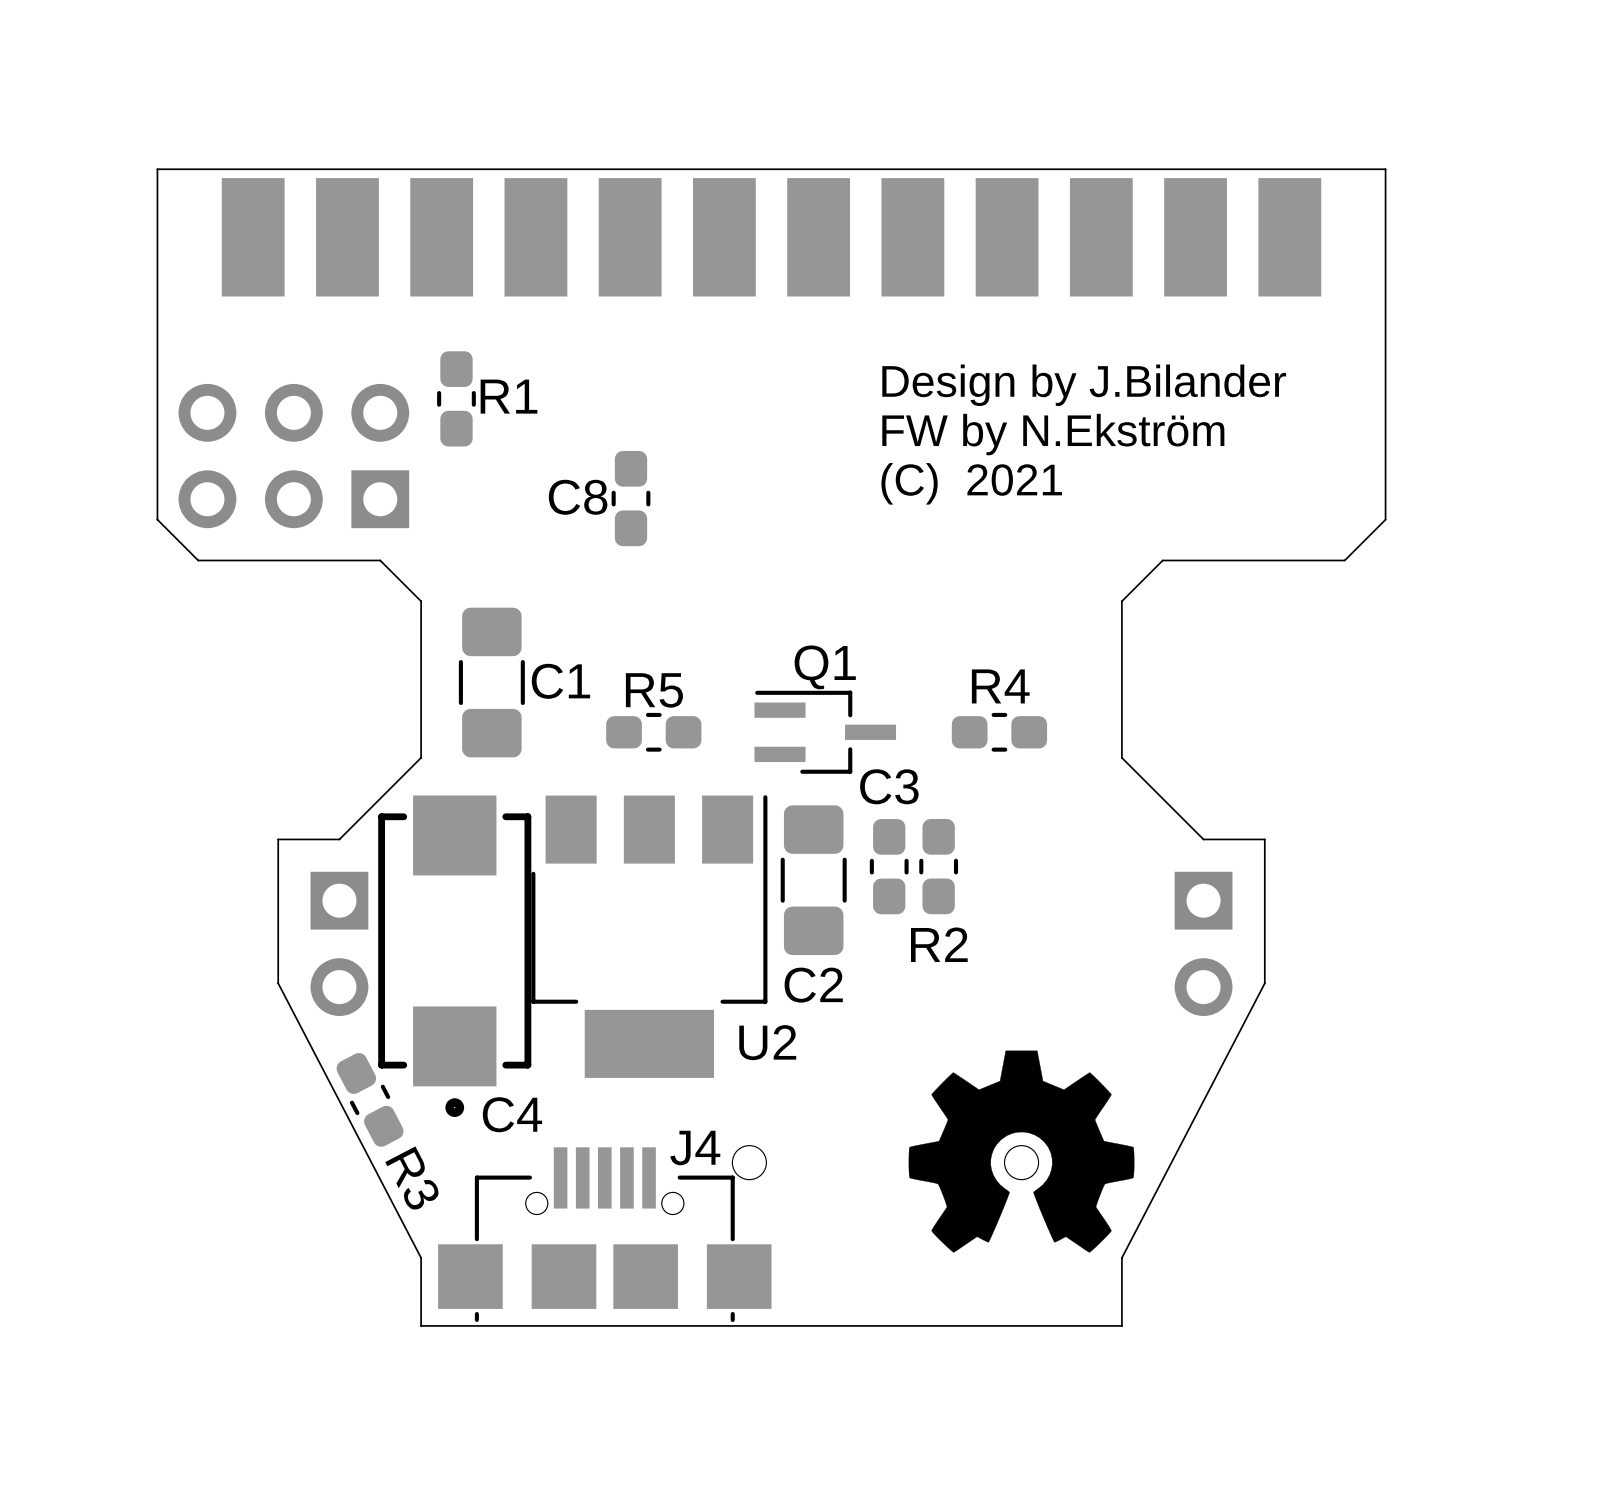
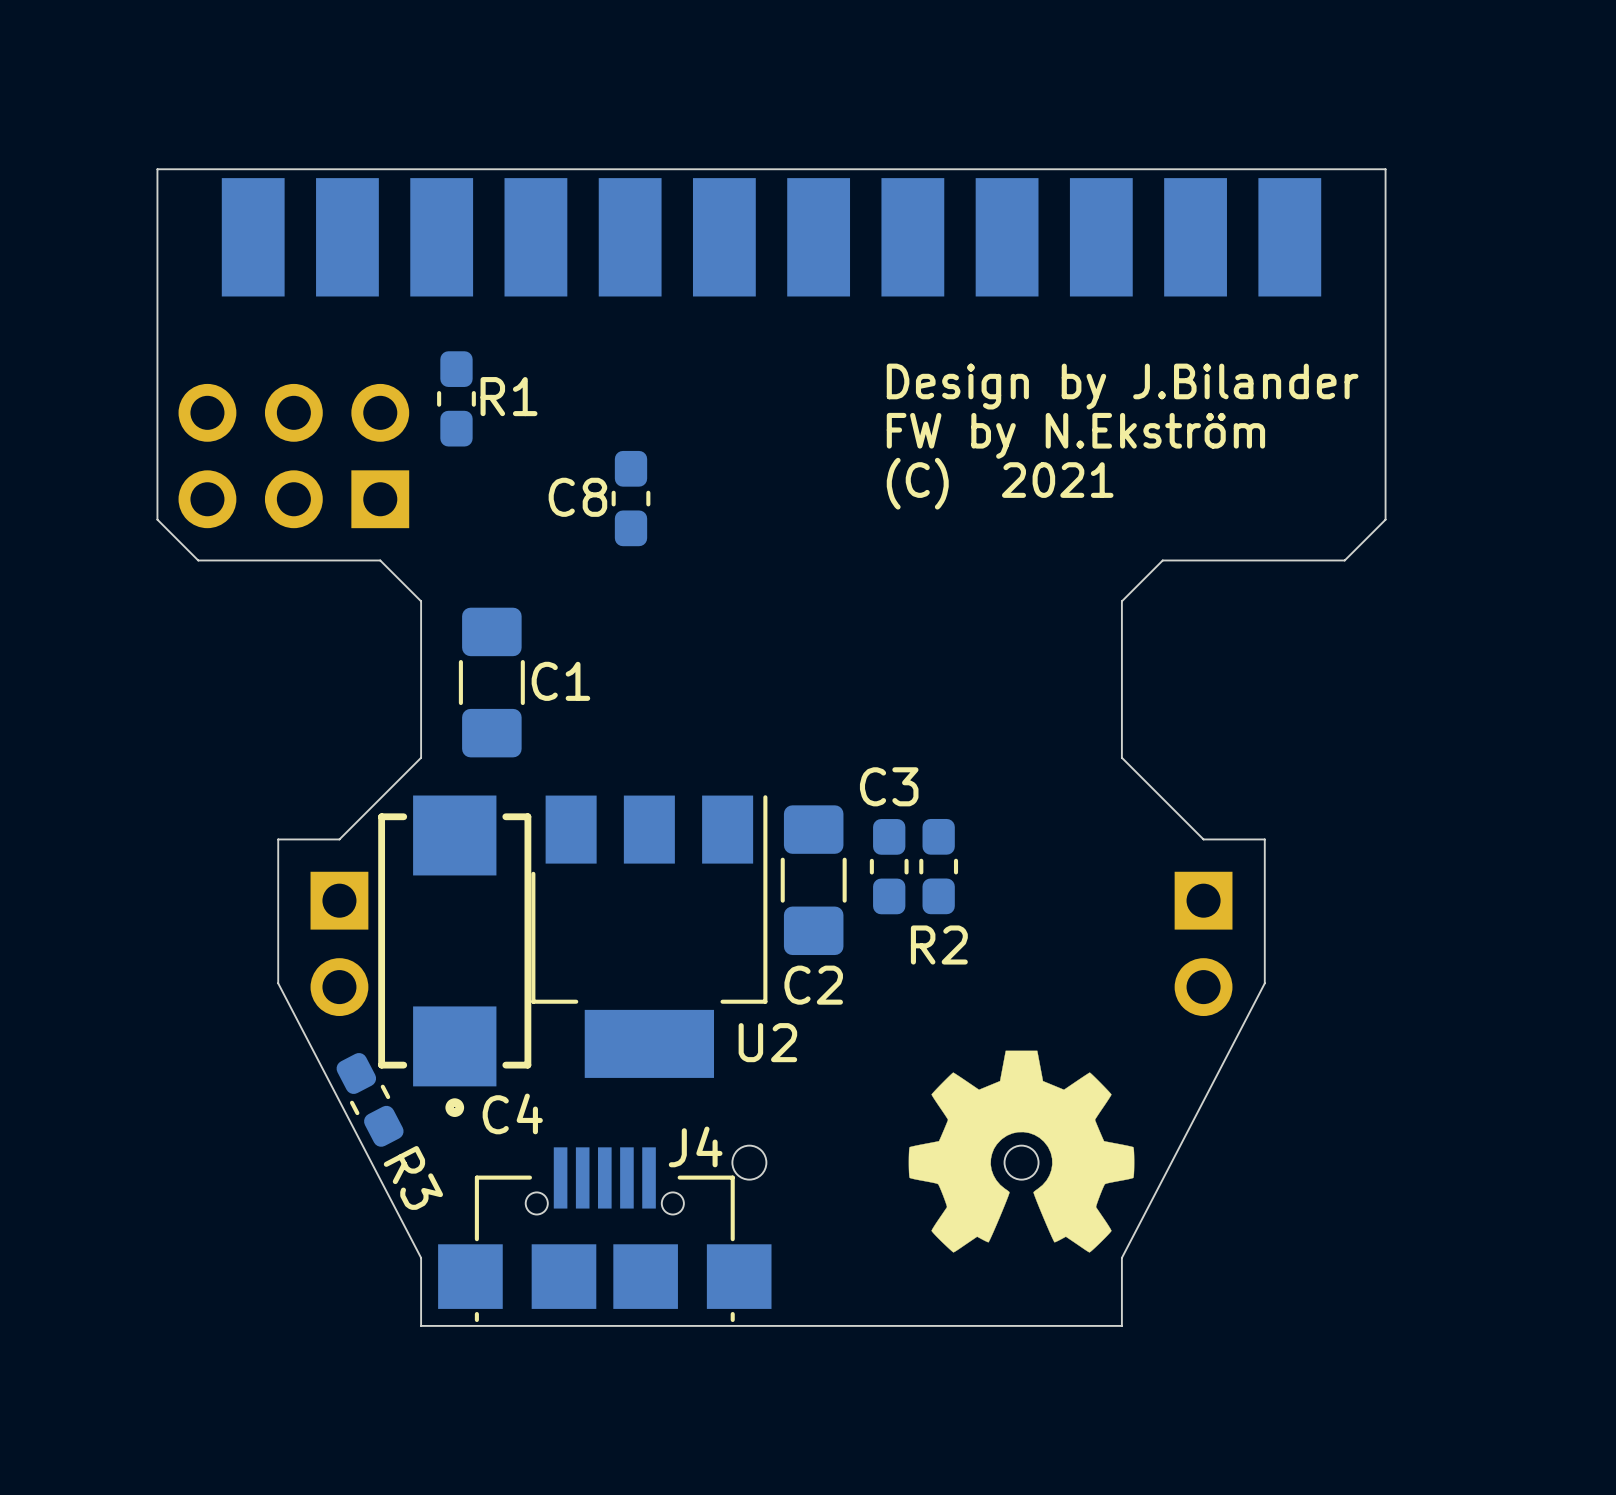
R5: (653, 732) -> none
Q1: (825, 732) -> none
R4: (999, 732) -> none

